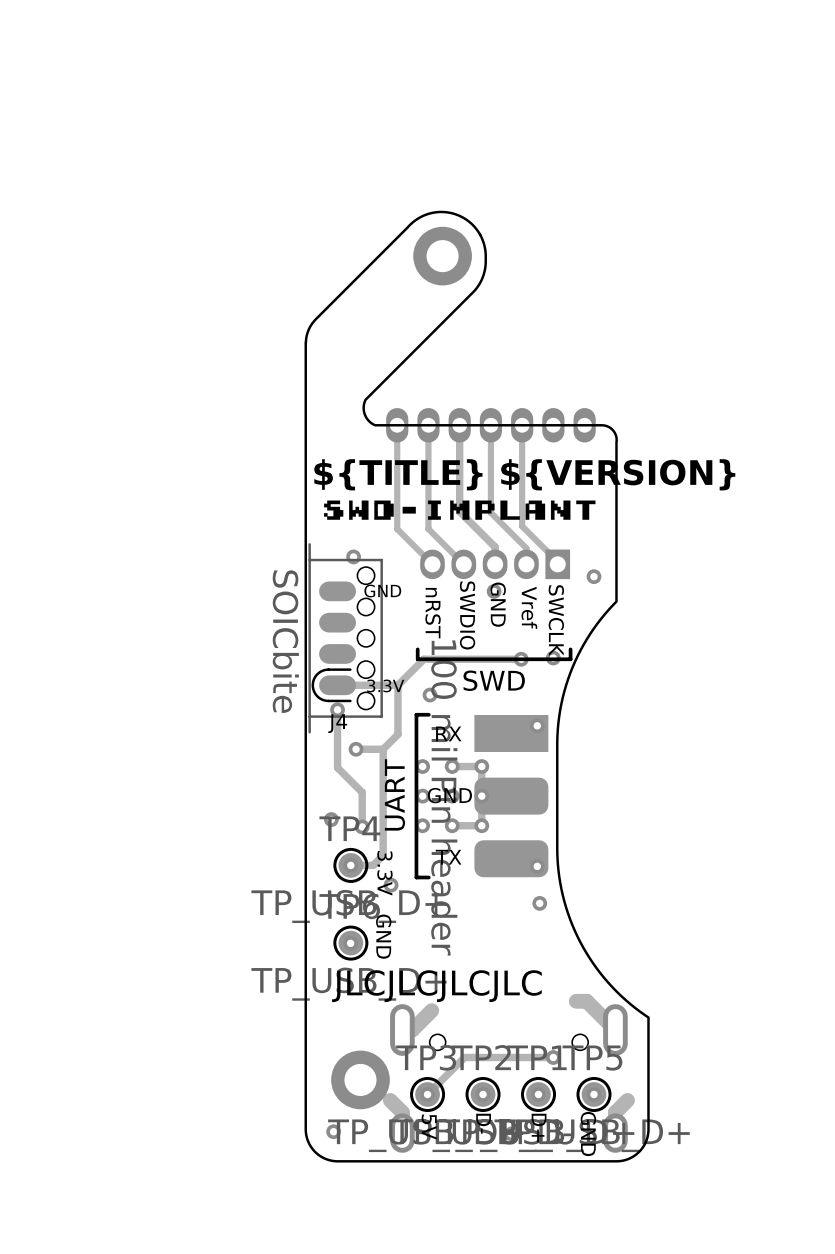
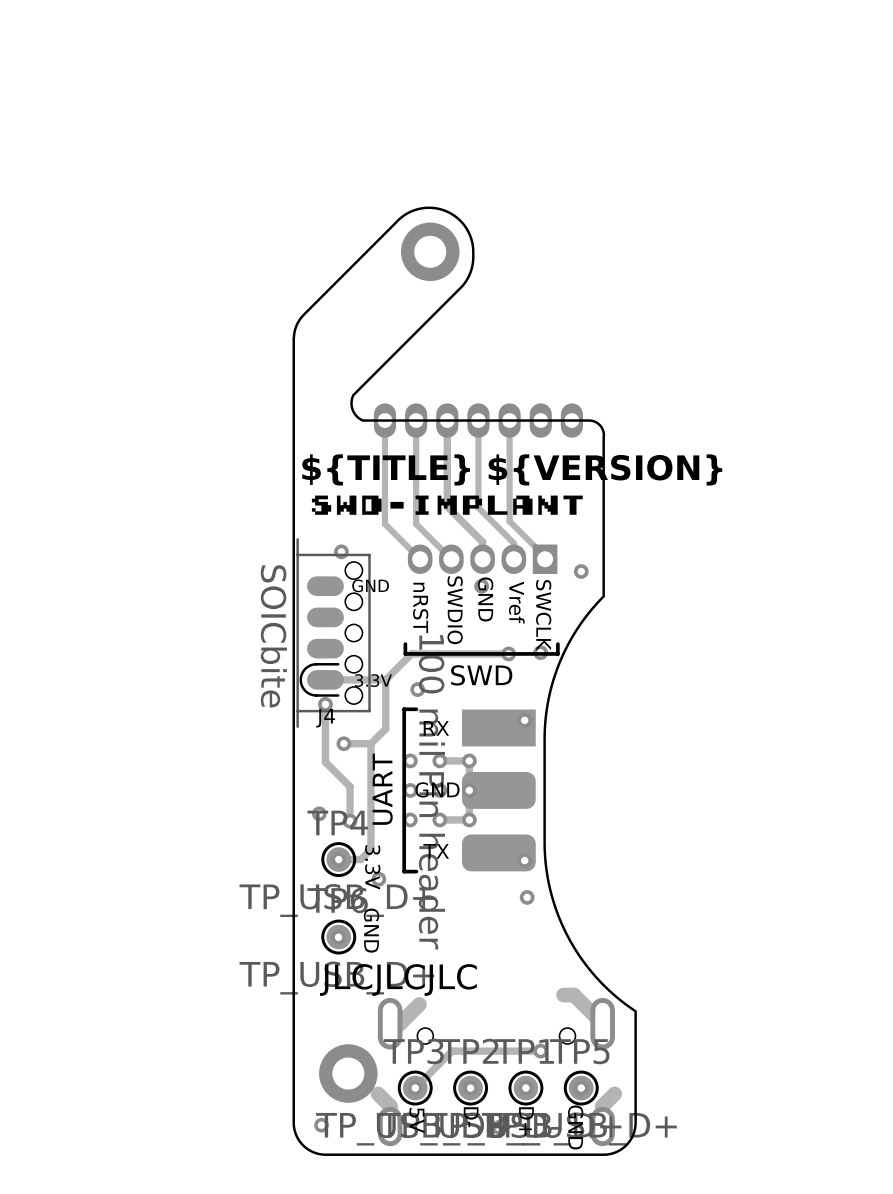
text: JLCJLCJLCJLC (436, 986) -> JLCJLCJLC (398, 979)

